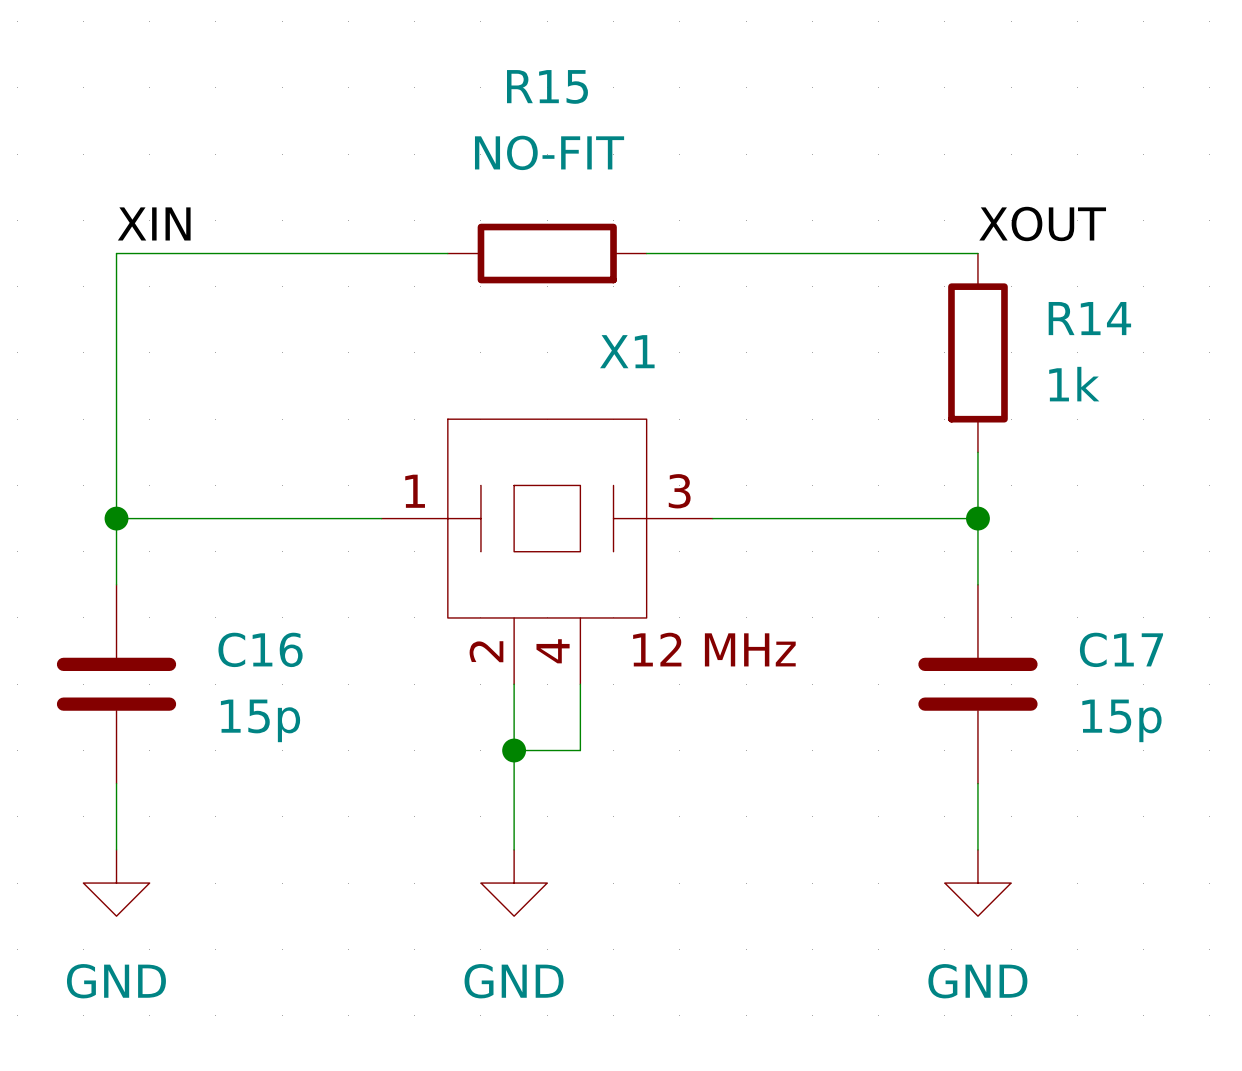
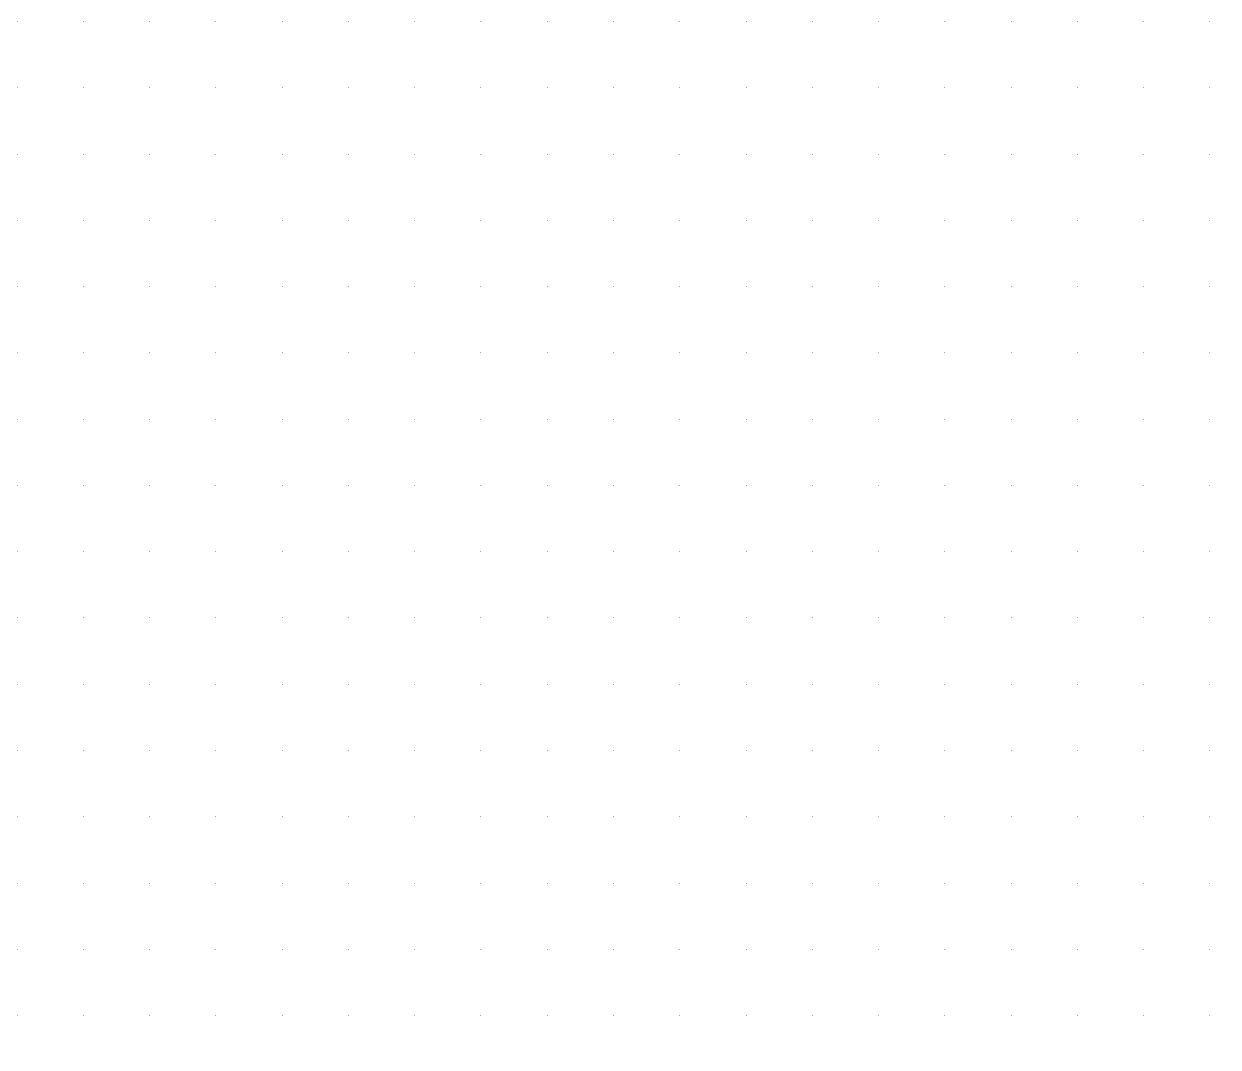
label: XIN (154, 223) -> none
label: XOUT (1042, 223) -> none
wire: (447, 253) (116, 253) (116, 584) -> none
R15: NO-FIT (547, 253) -> none
wire: (646, 253) (977, 253) -> none
R14: 1k (977, 352) -> none
wire: (977, 452) (977, 584) -> none
wire: (116, 518) (381, 518) -> none
junction: (116, 518) -> none
wire: (712, 518) (977, 518) -> none
junction: (977, 518) -> none
X1: (547, 551) -> none
C16: 15p (116, 684) -> none
wire: (514, 684) (514, 849) -> none
wire: (580, 684) (580, 750) (514, 750) -> none
C17: 15p (977, 684) -> none
junction: (514, 750) -> none
wire: (116, 783) (116, 849) -> none
wire: (977, 783) (977, 849) -> none
power symbol: GND (116, 883) -> none
power symbol: GND (514, 883) -> none
power symbol: GND (977, 883) -> none

